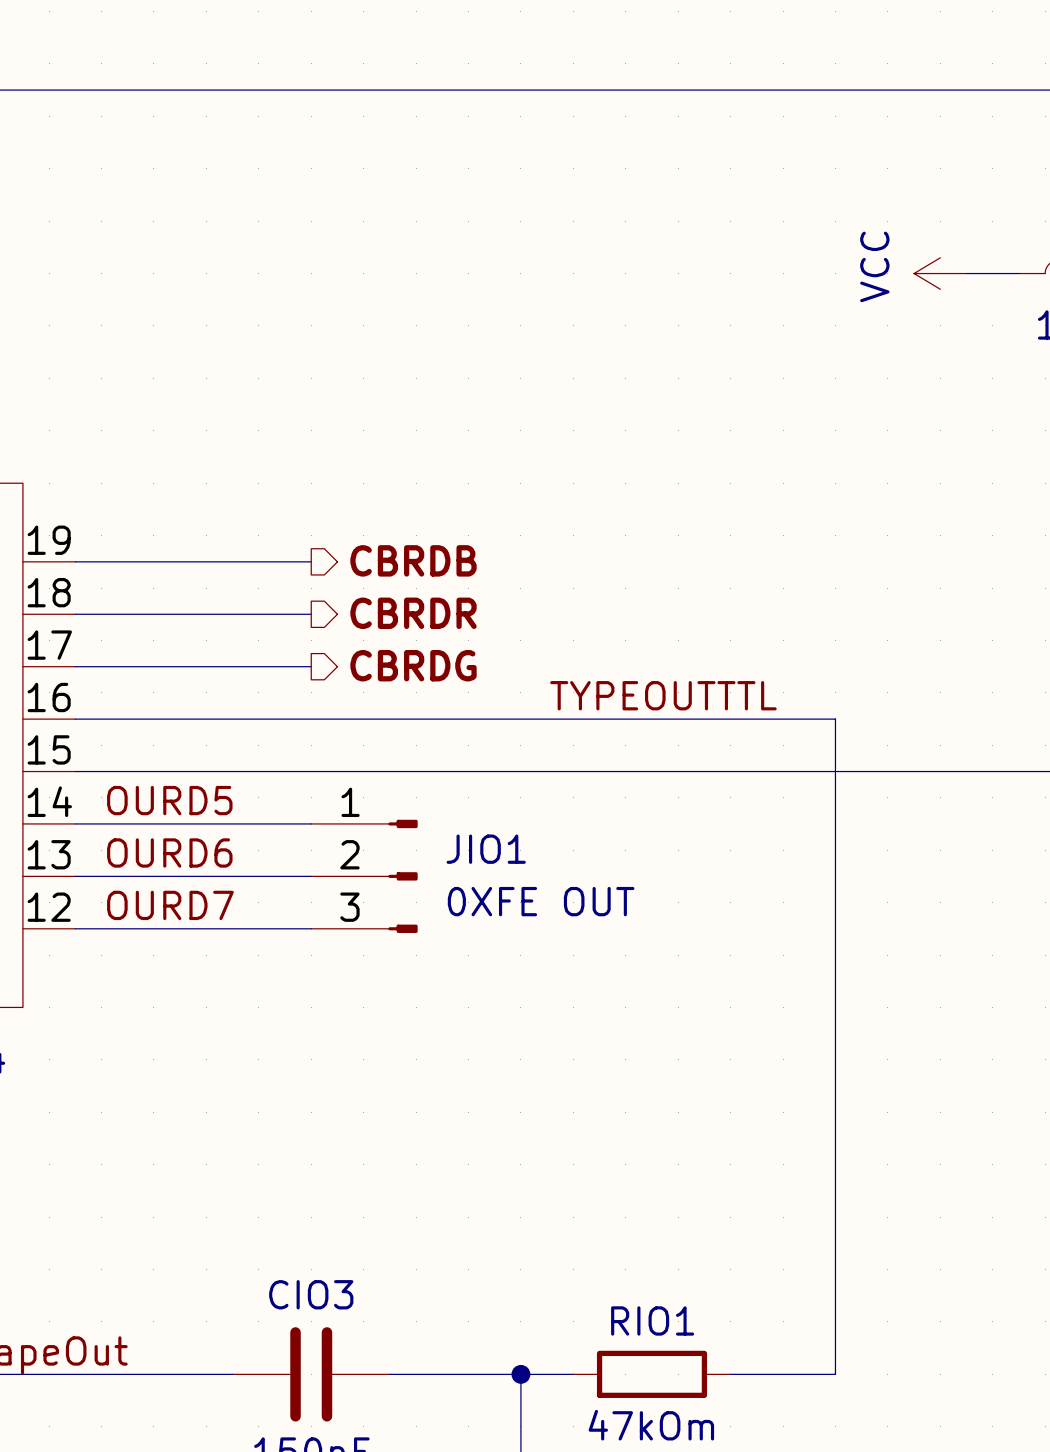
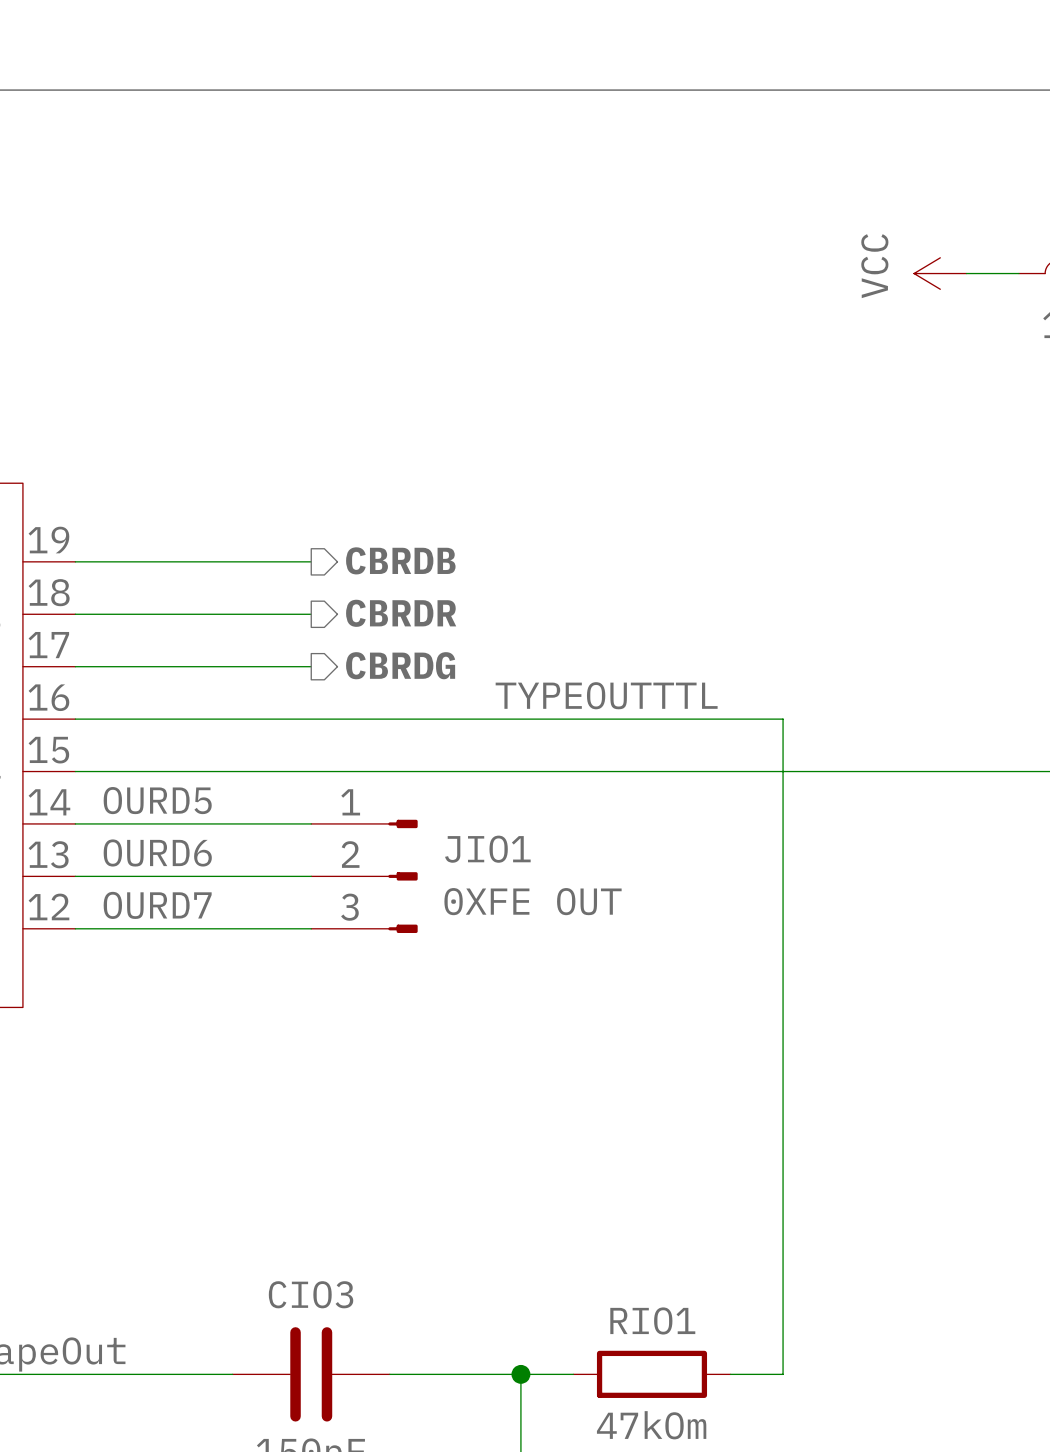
label position: TYPEOUTTTL (663, 695) -> TYPEOUTTTL (606, 695)
wire: (783, 719) (835, 719) (835, 1374) (783, 1374) -> (783, 719) (783, 1374)

